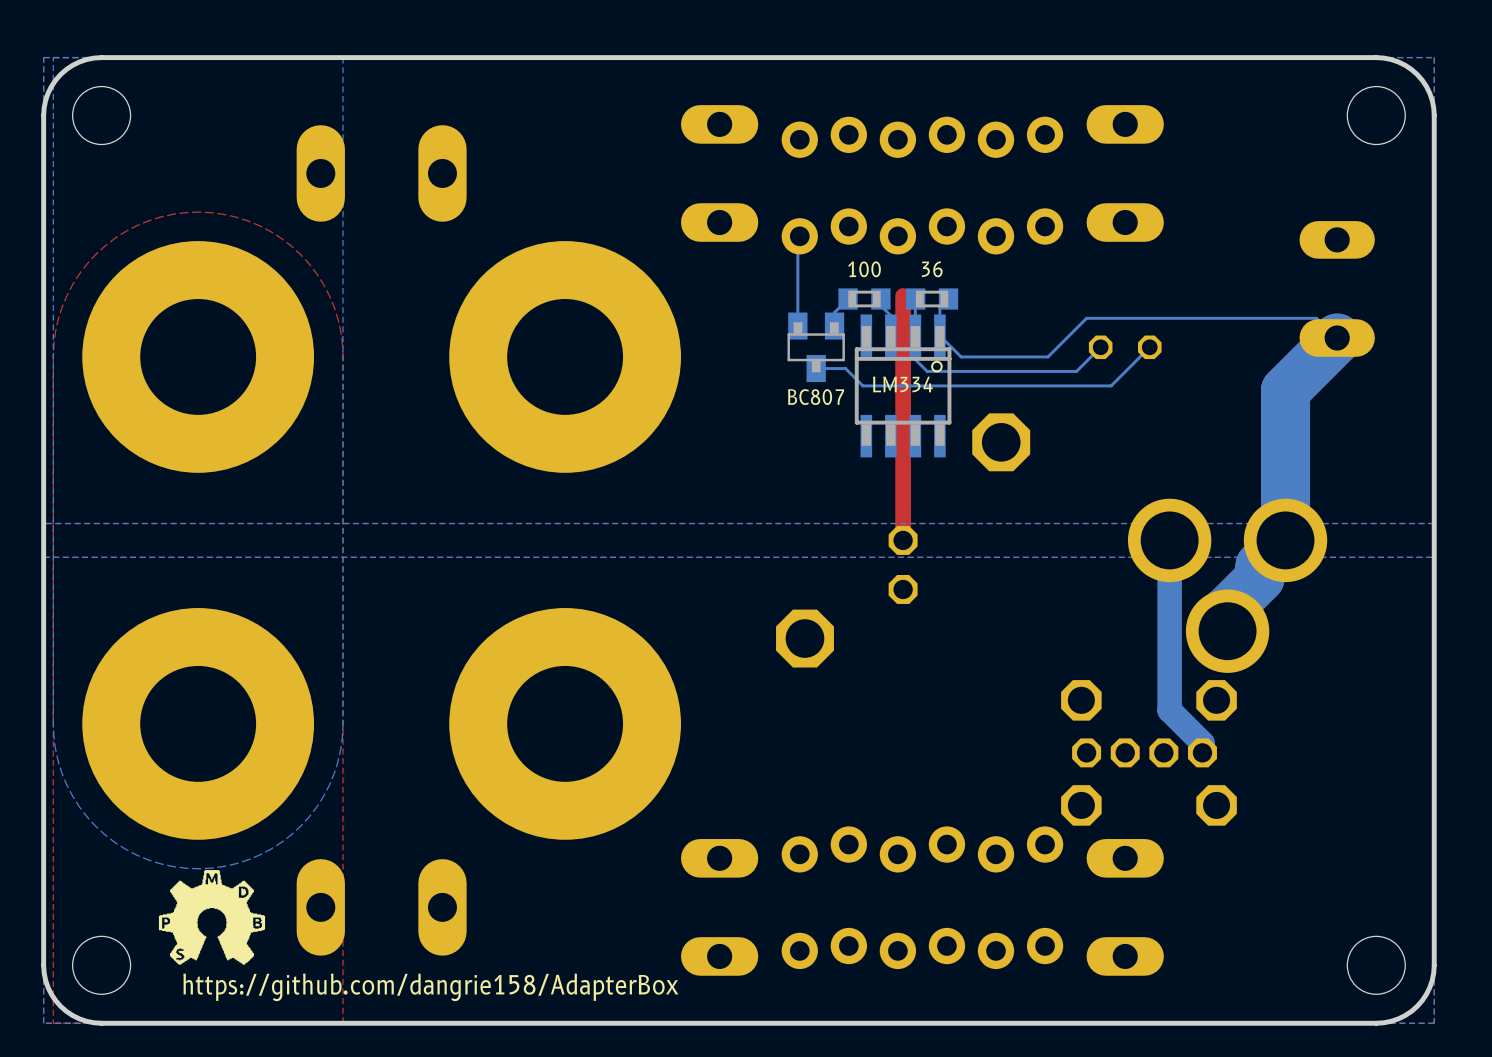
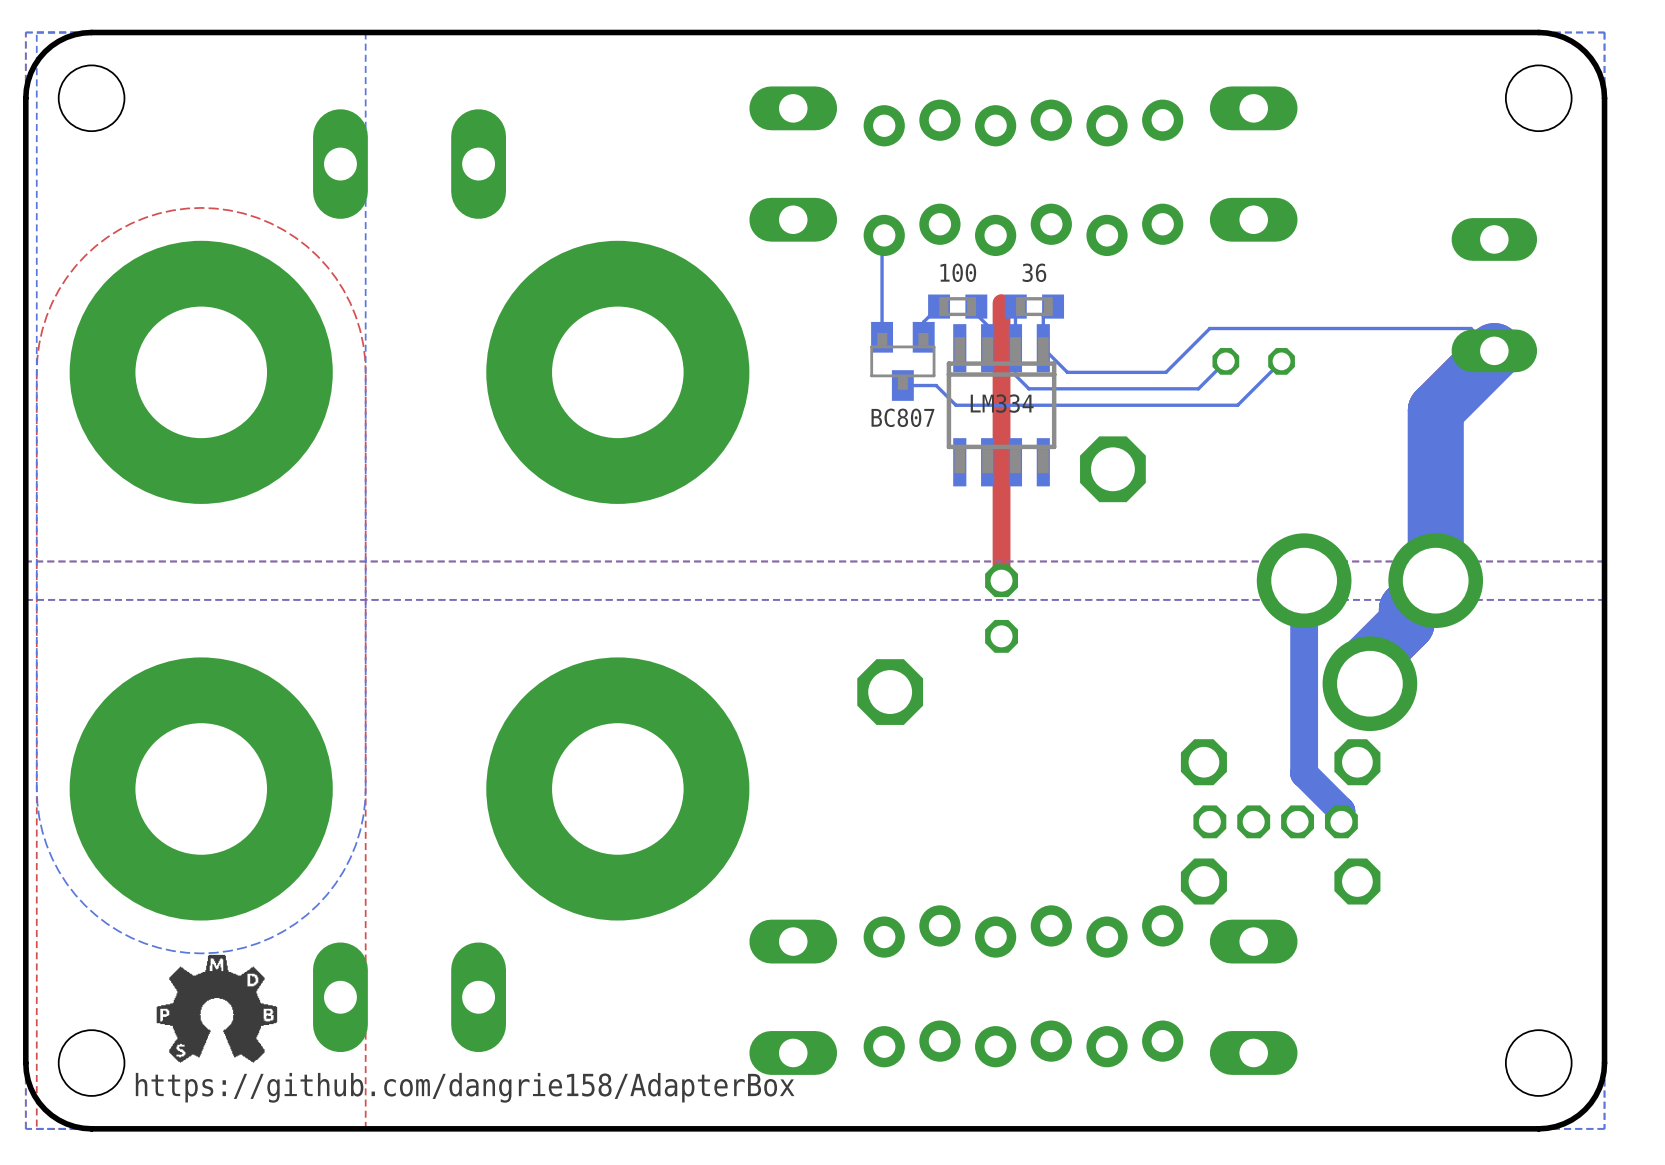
drawing: [931, 360, 943, 373] -> none

